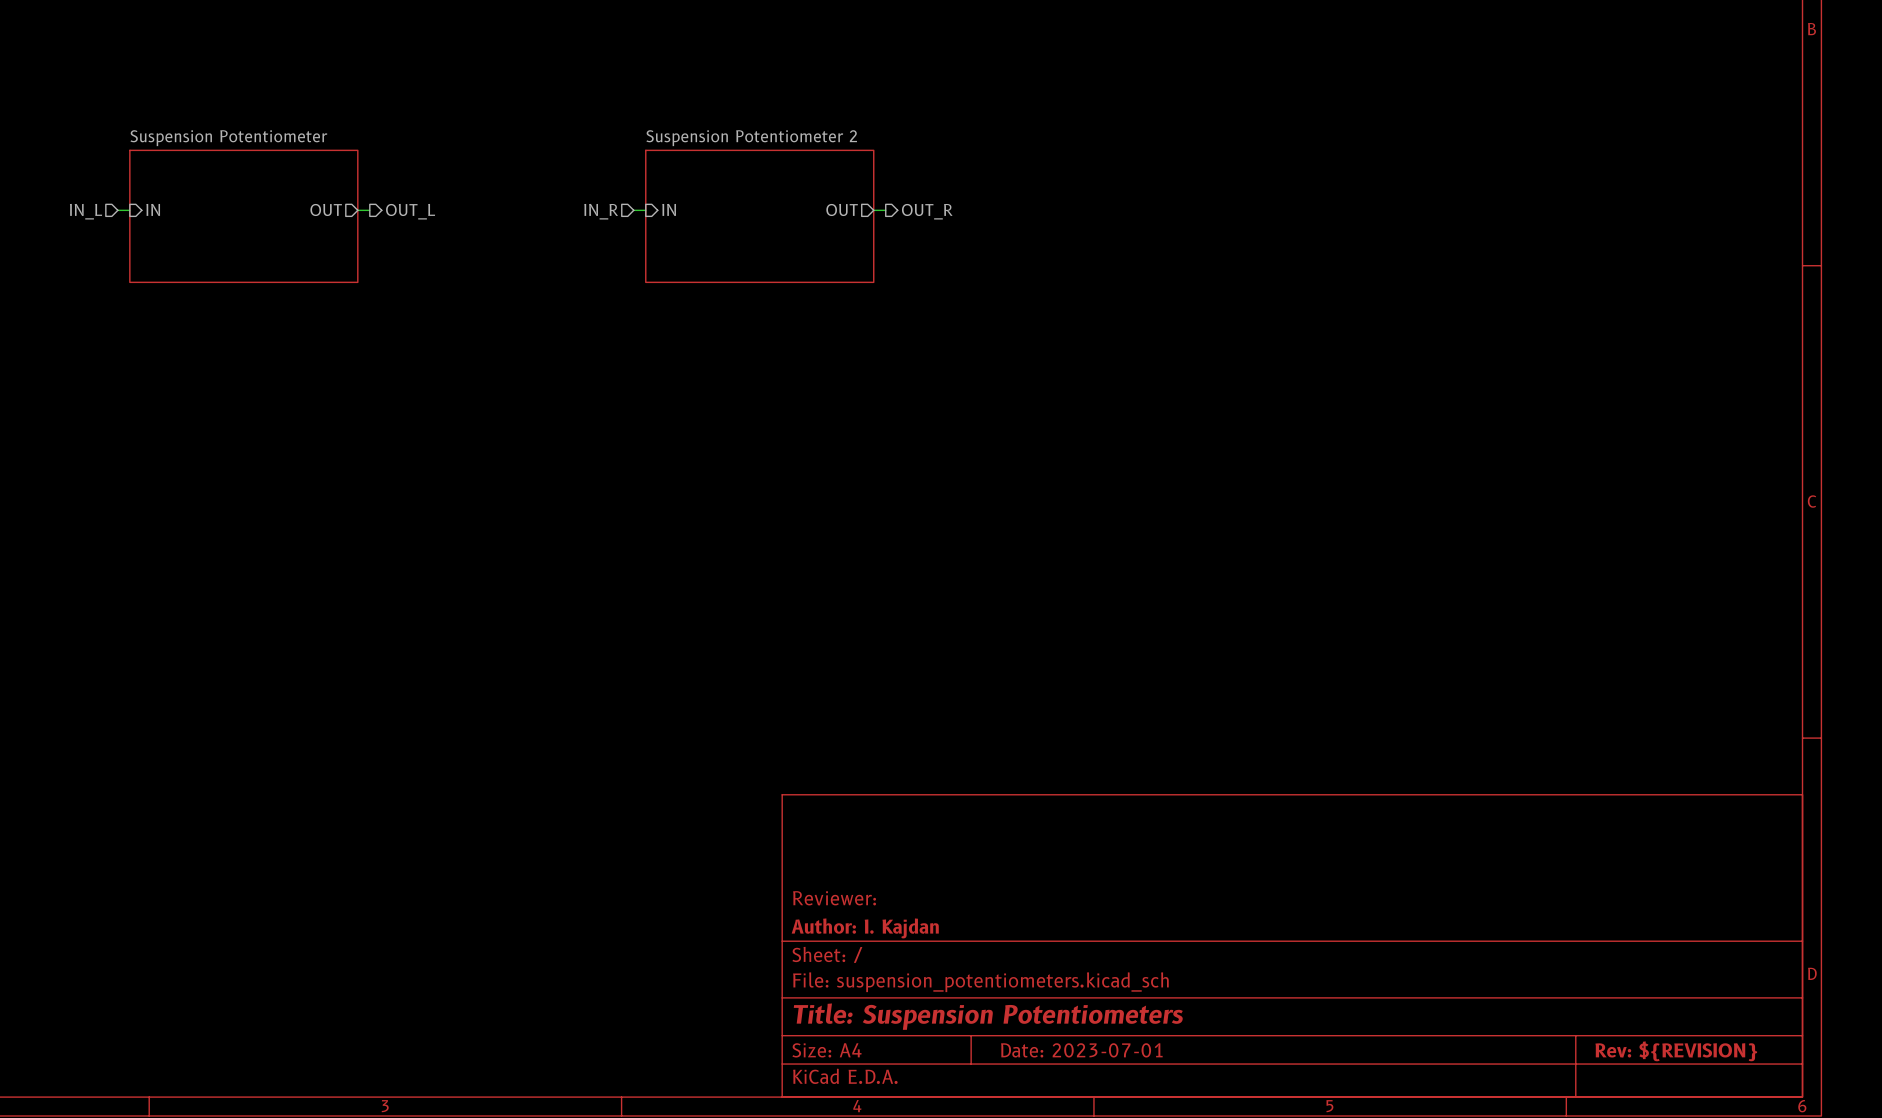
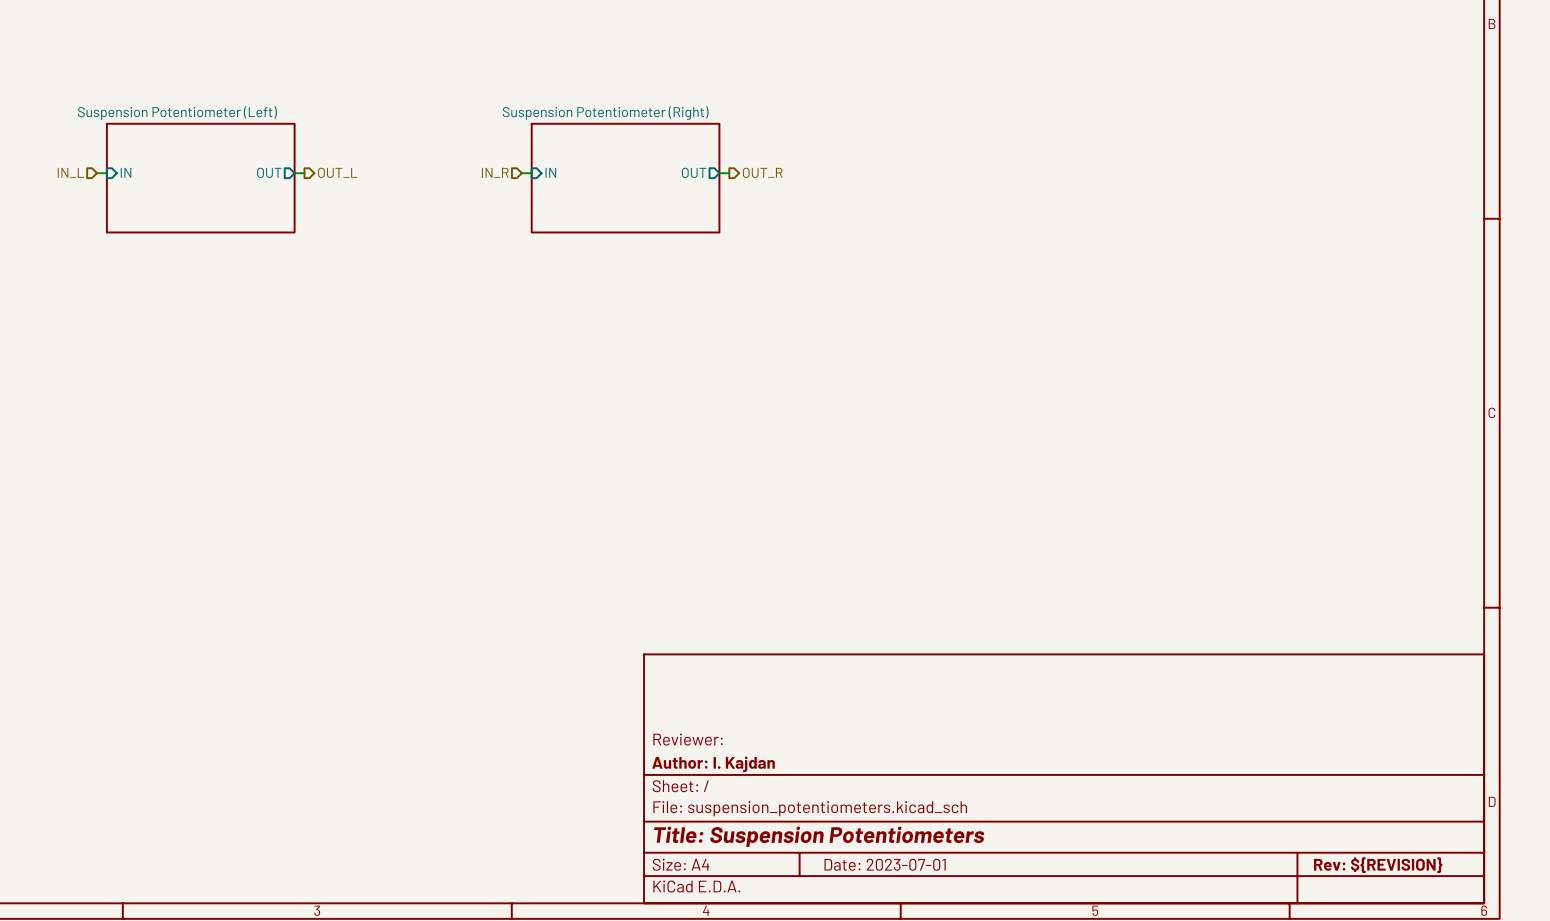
sheet Suspension Potentiometer name: Suspension Potentiometer (228, 138) -> Suspension Potentiometer (Left) (177, 113)
sheet Suspension Potentiometer 2 name: Suspension Potentiometer 2 (751, 138) -> Suspension Potentiometer (Right) (605, 113)

